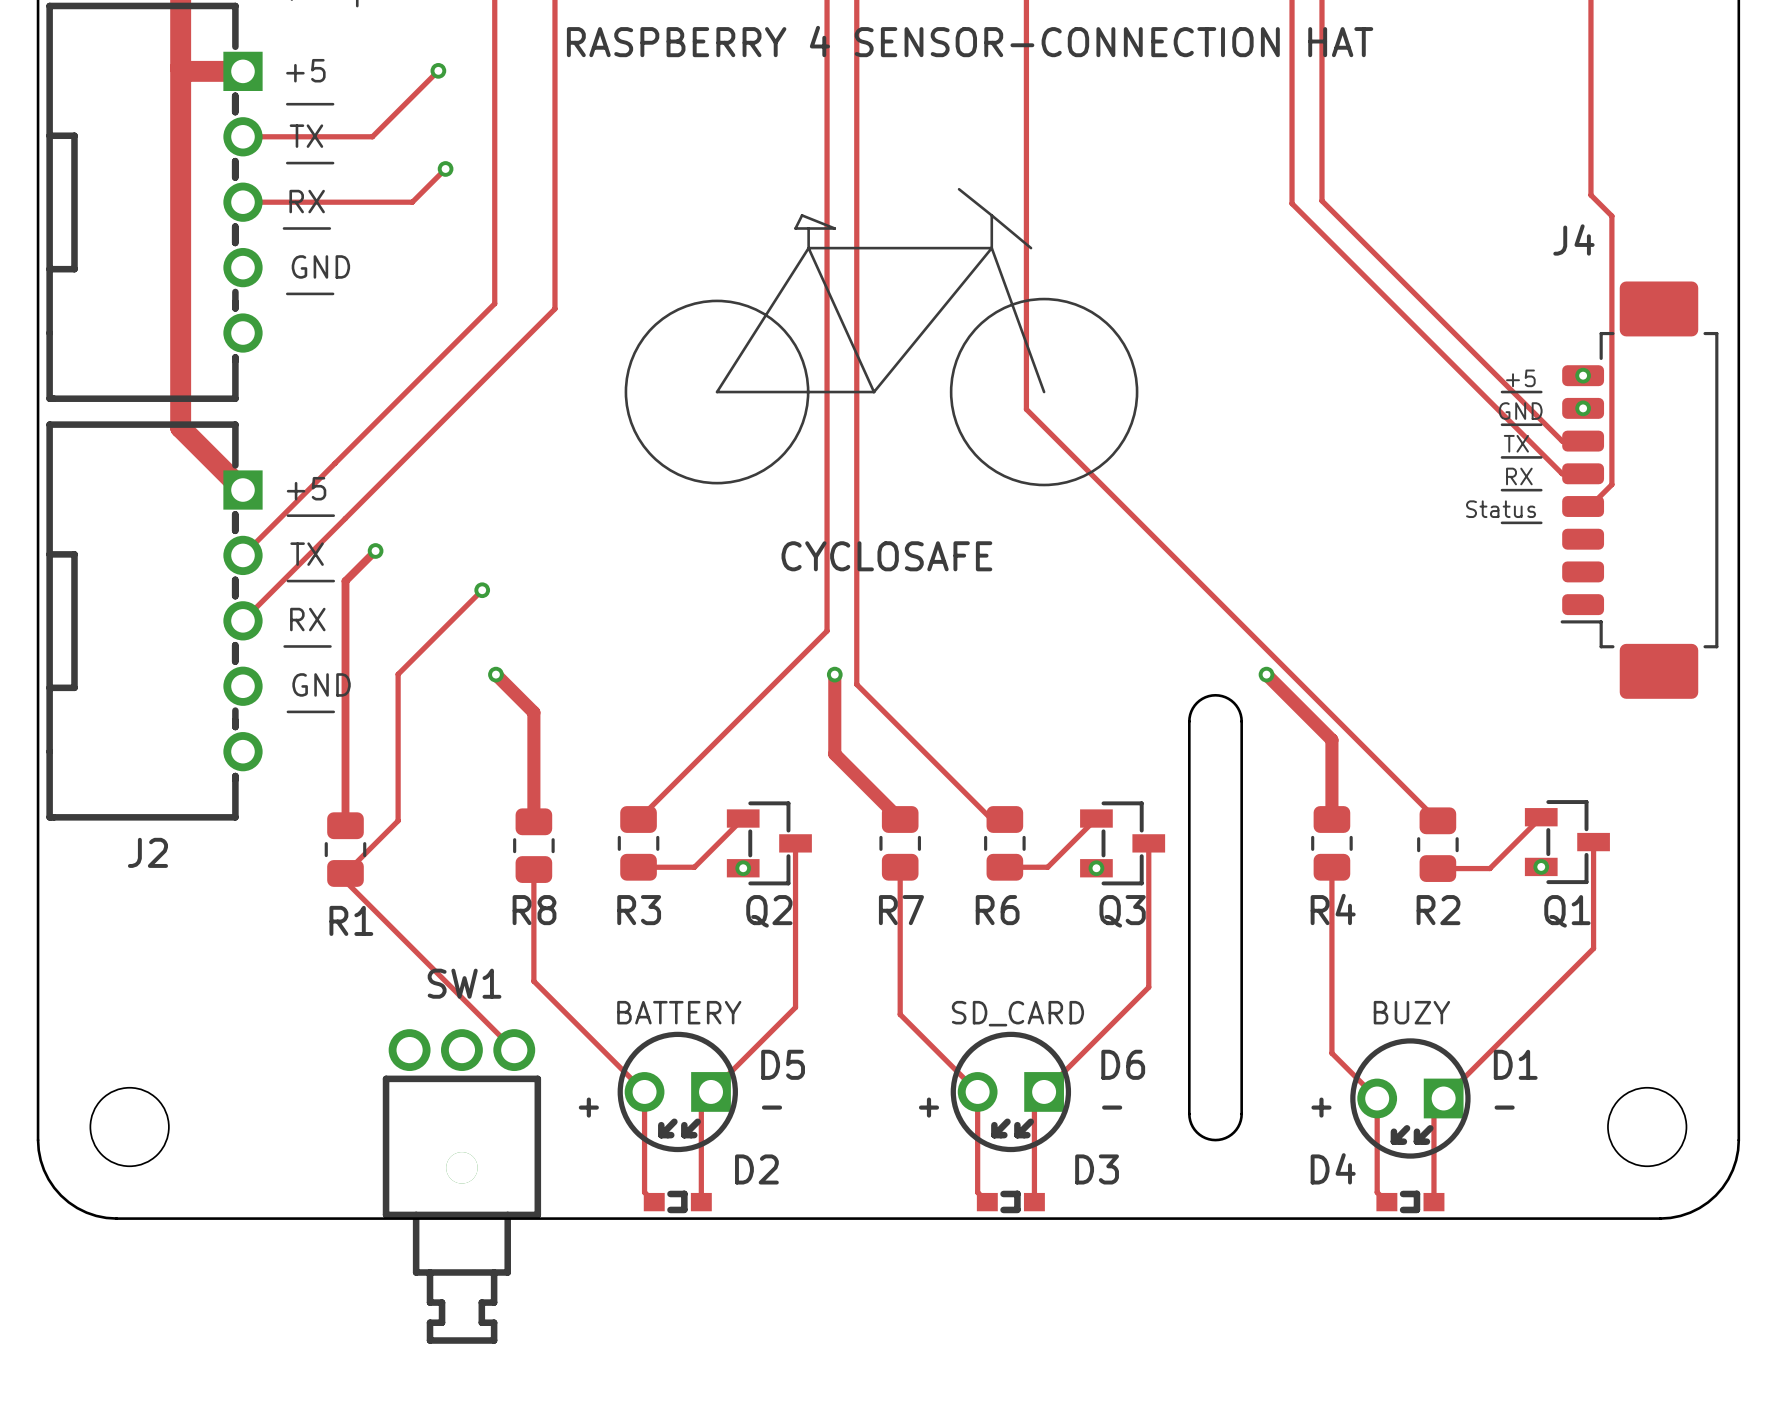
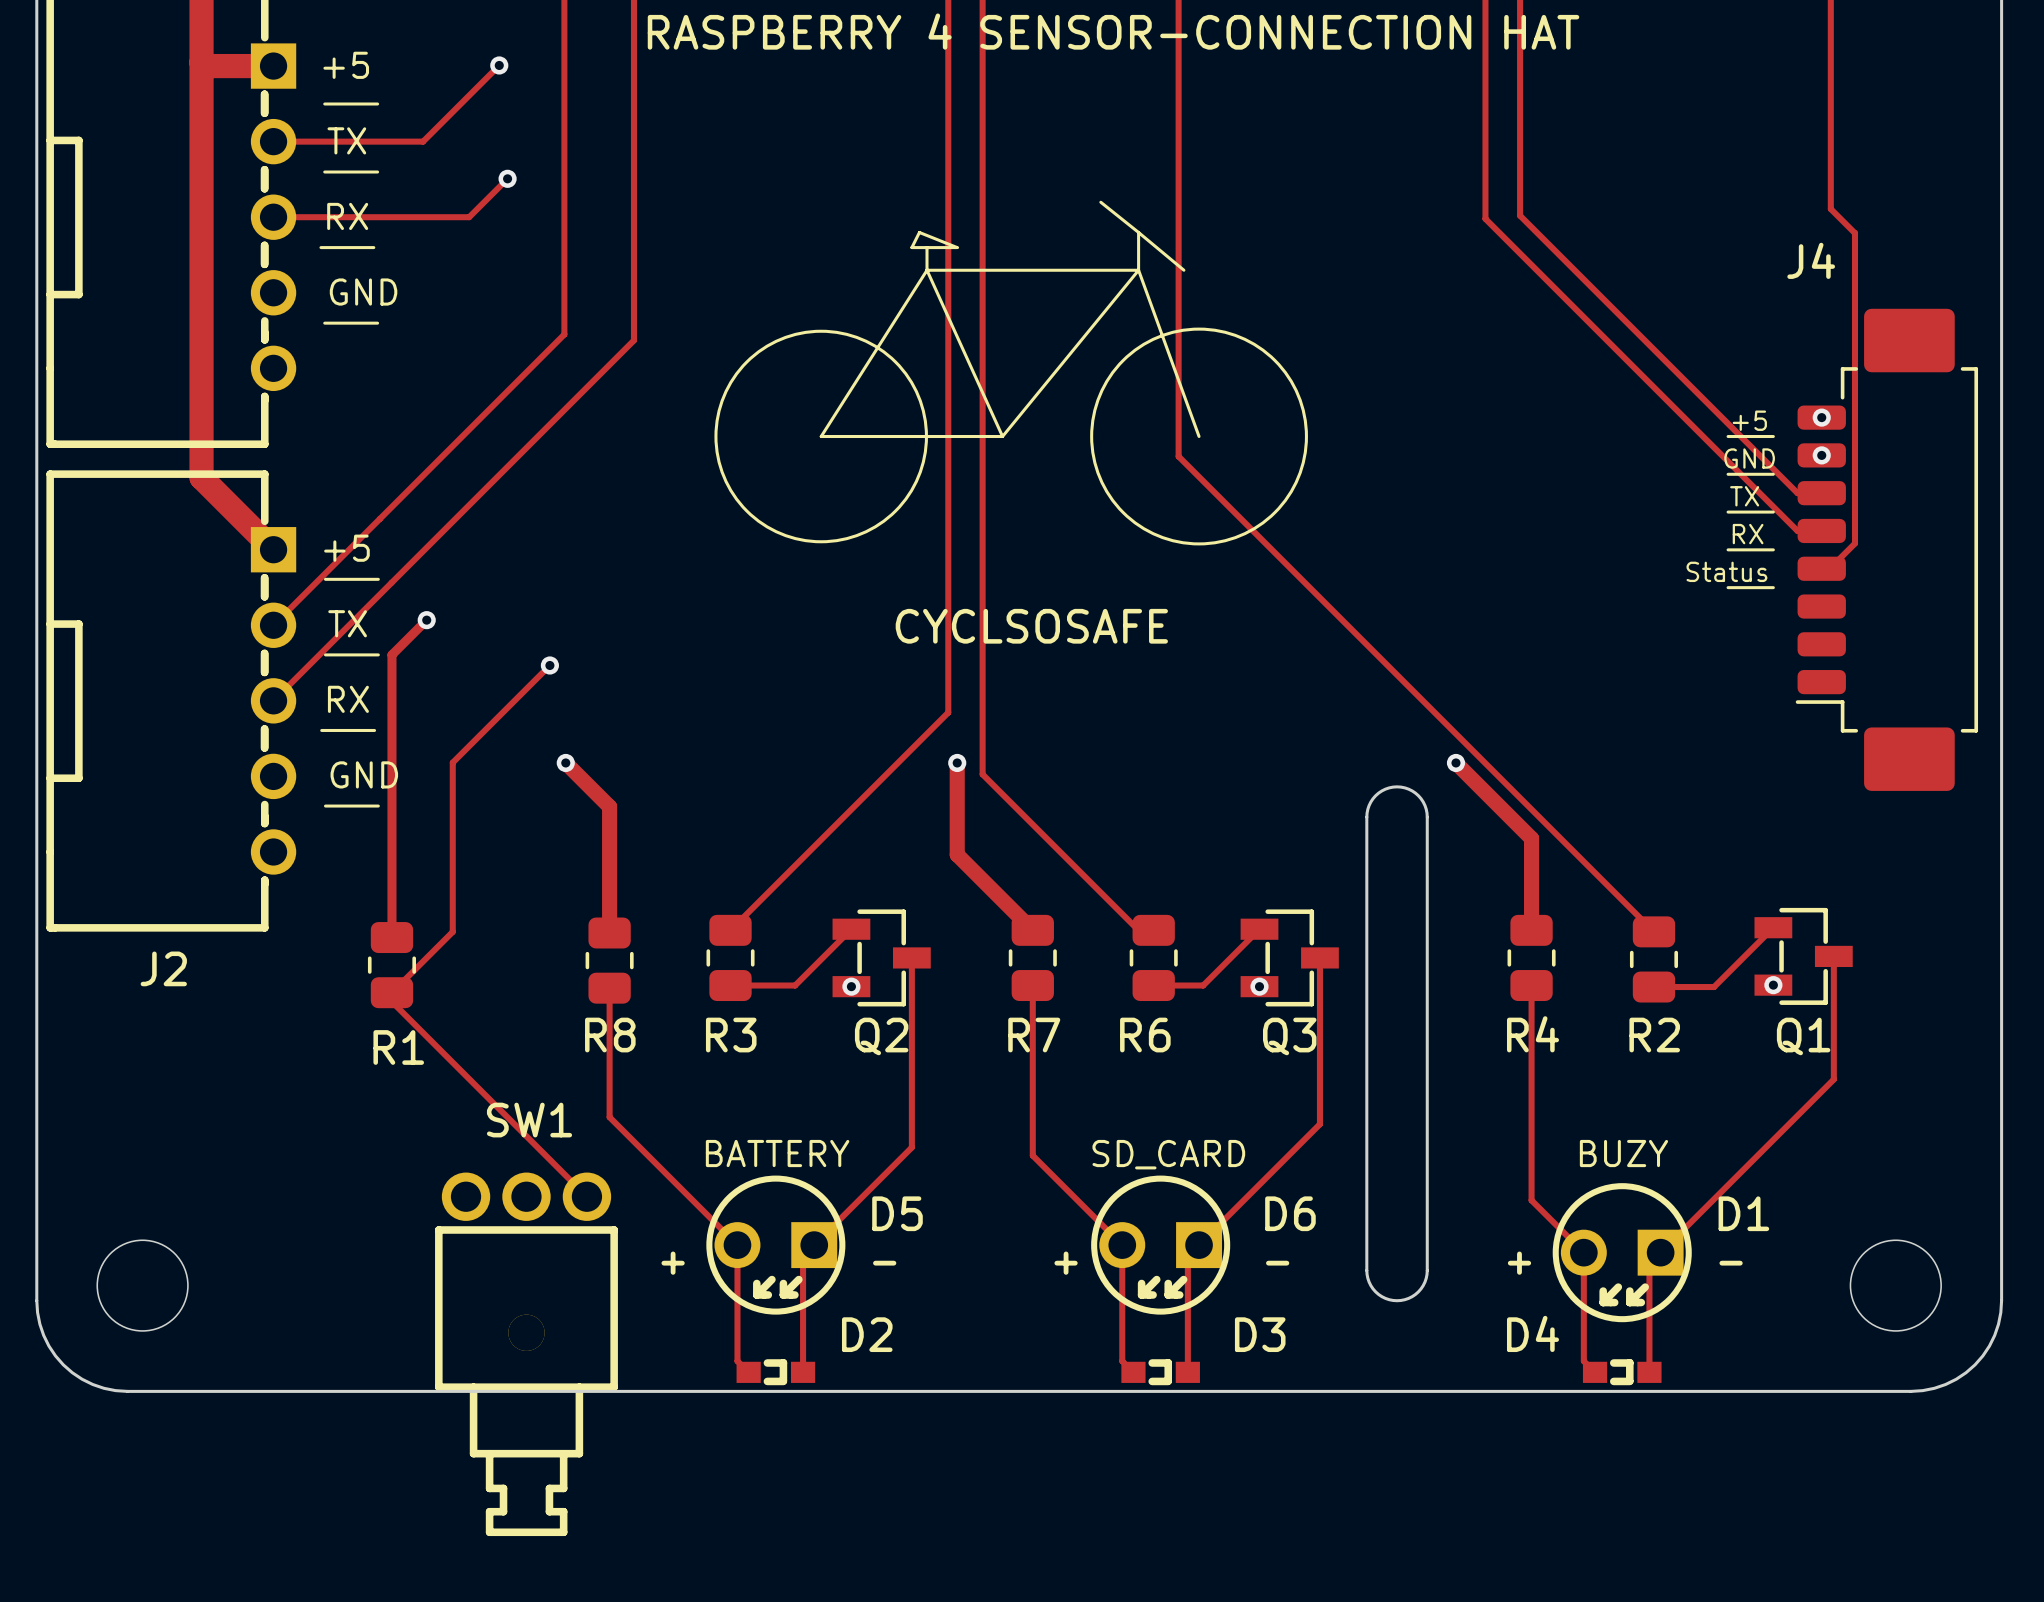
text: CYCLOSAFE (886, 556) -> CYCLSOSAFE (1031, 626)

